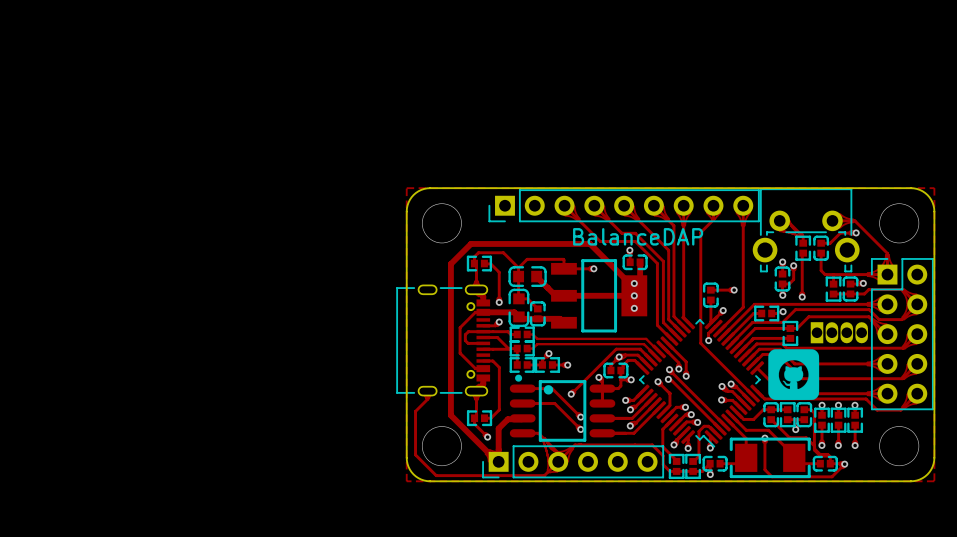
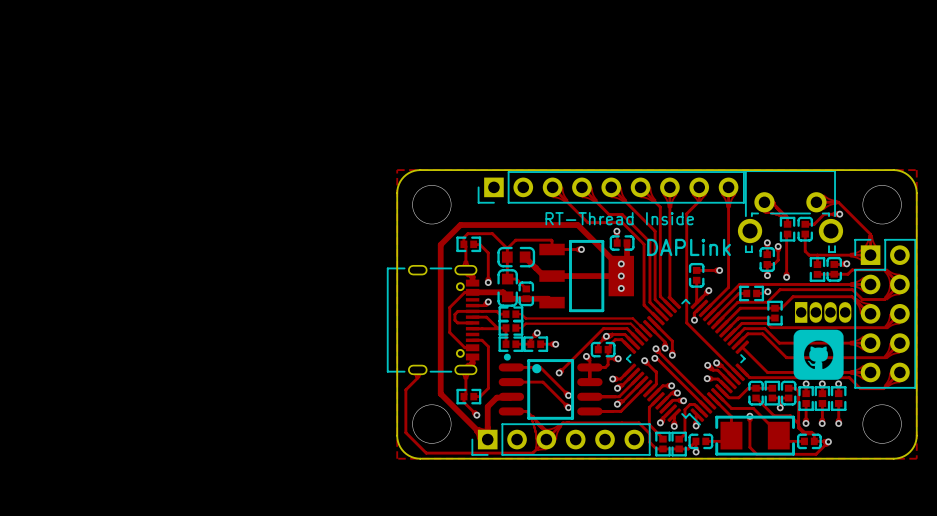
text: BalanceDAP (638, 236) -> RT-Thread Inside (619, 218)
text: none -> DAPLink (689, 247)
drawing position: (793, 374) -> (818, 354)

